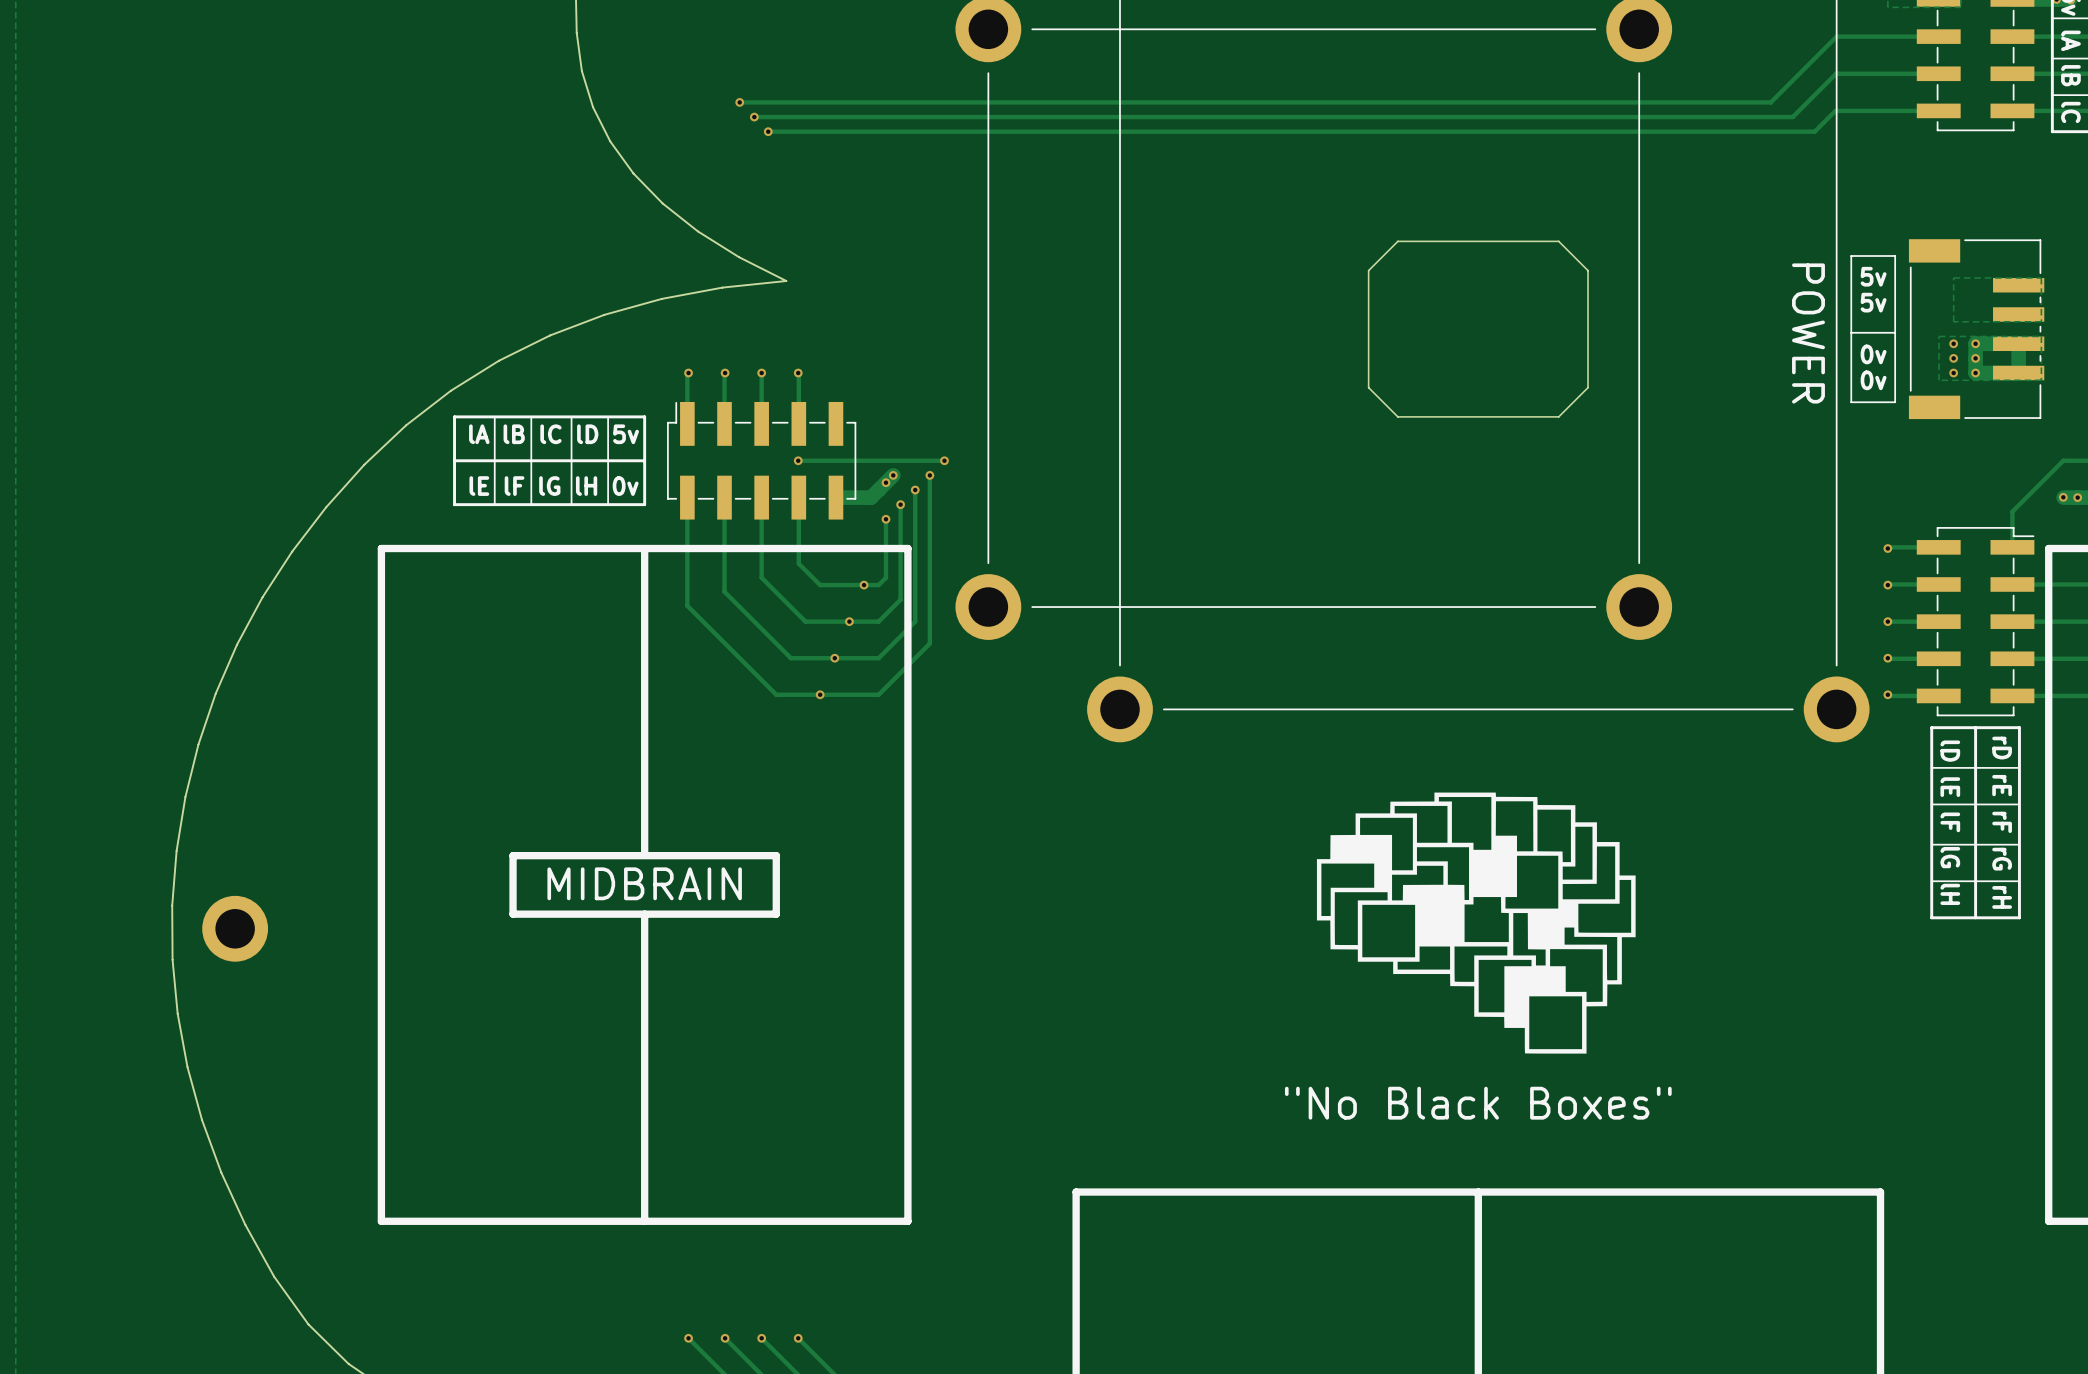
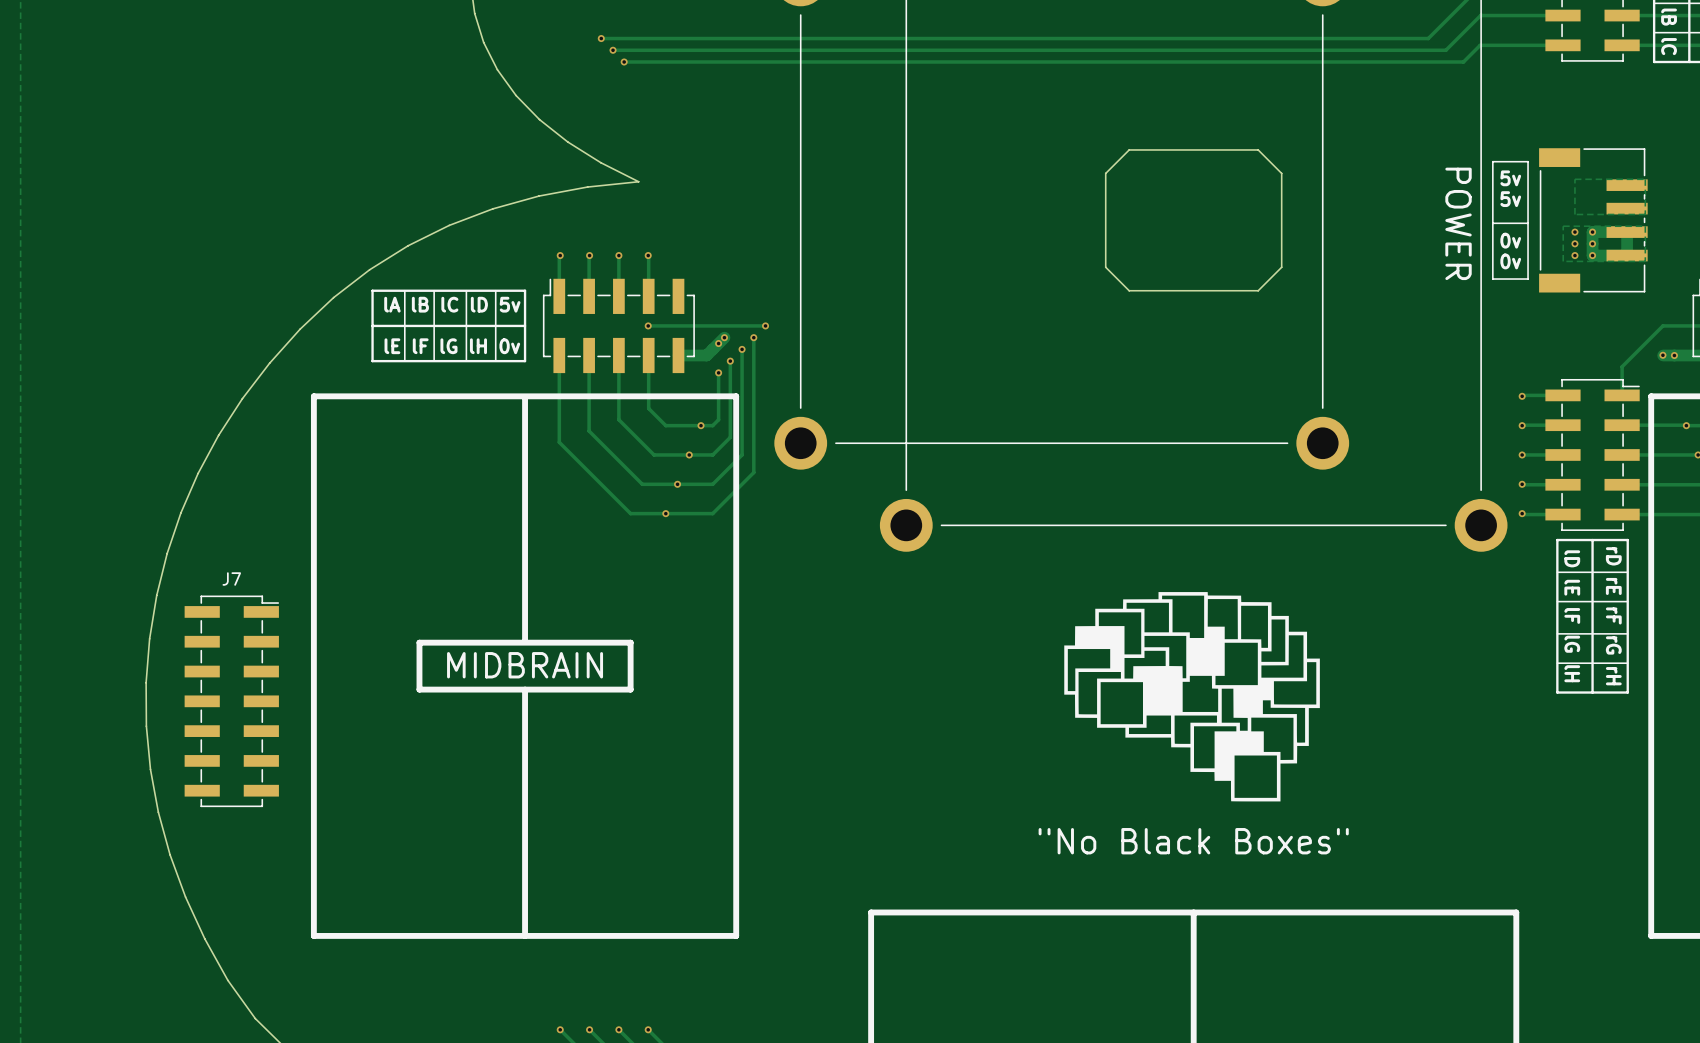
part: (235, 928) -> none
J7: none -> (231, 701)

